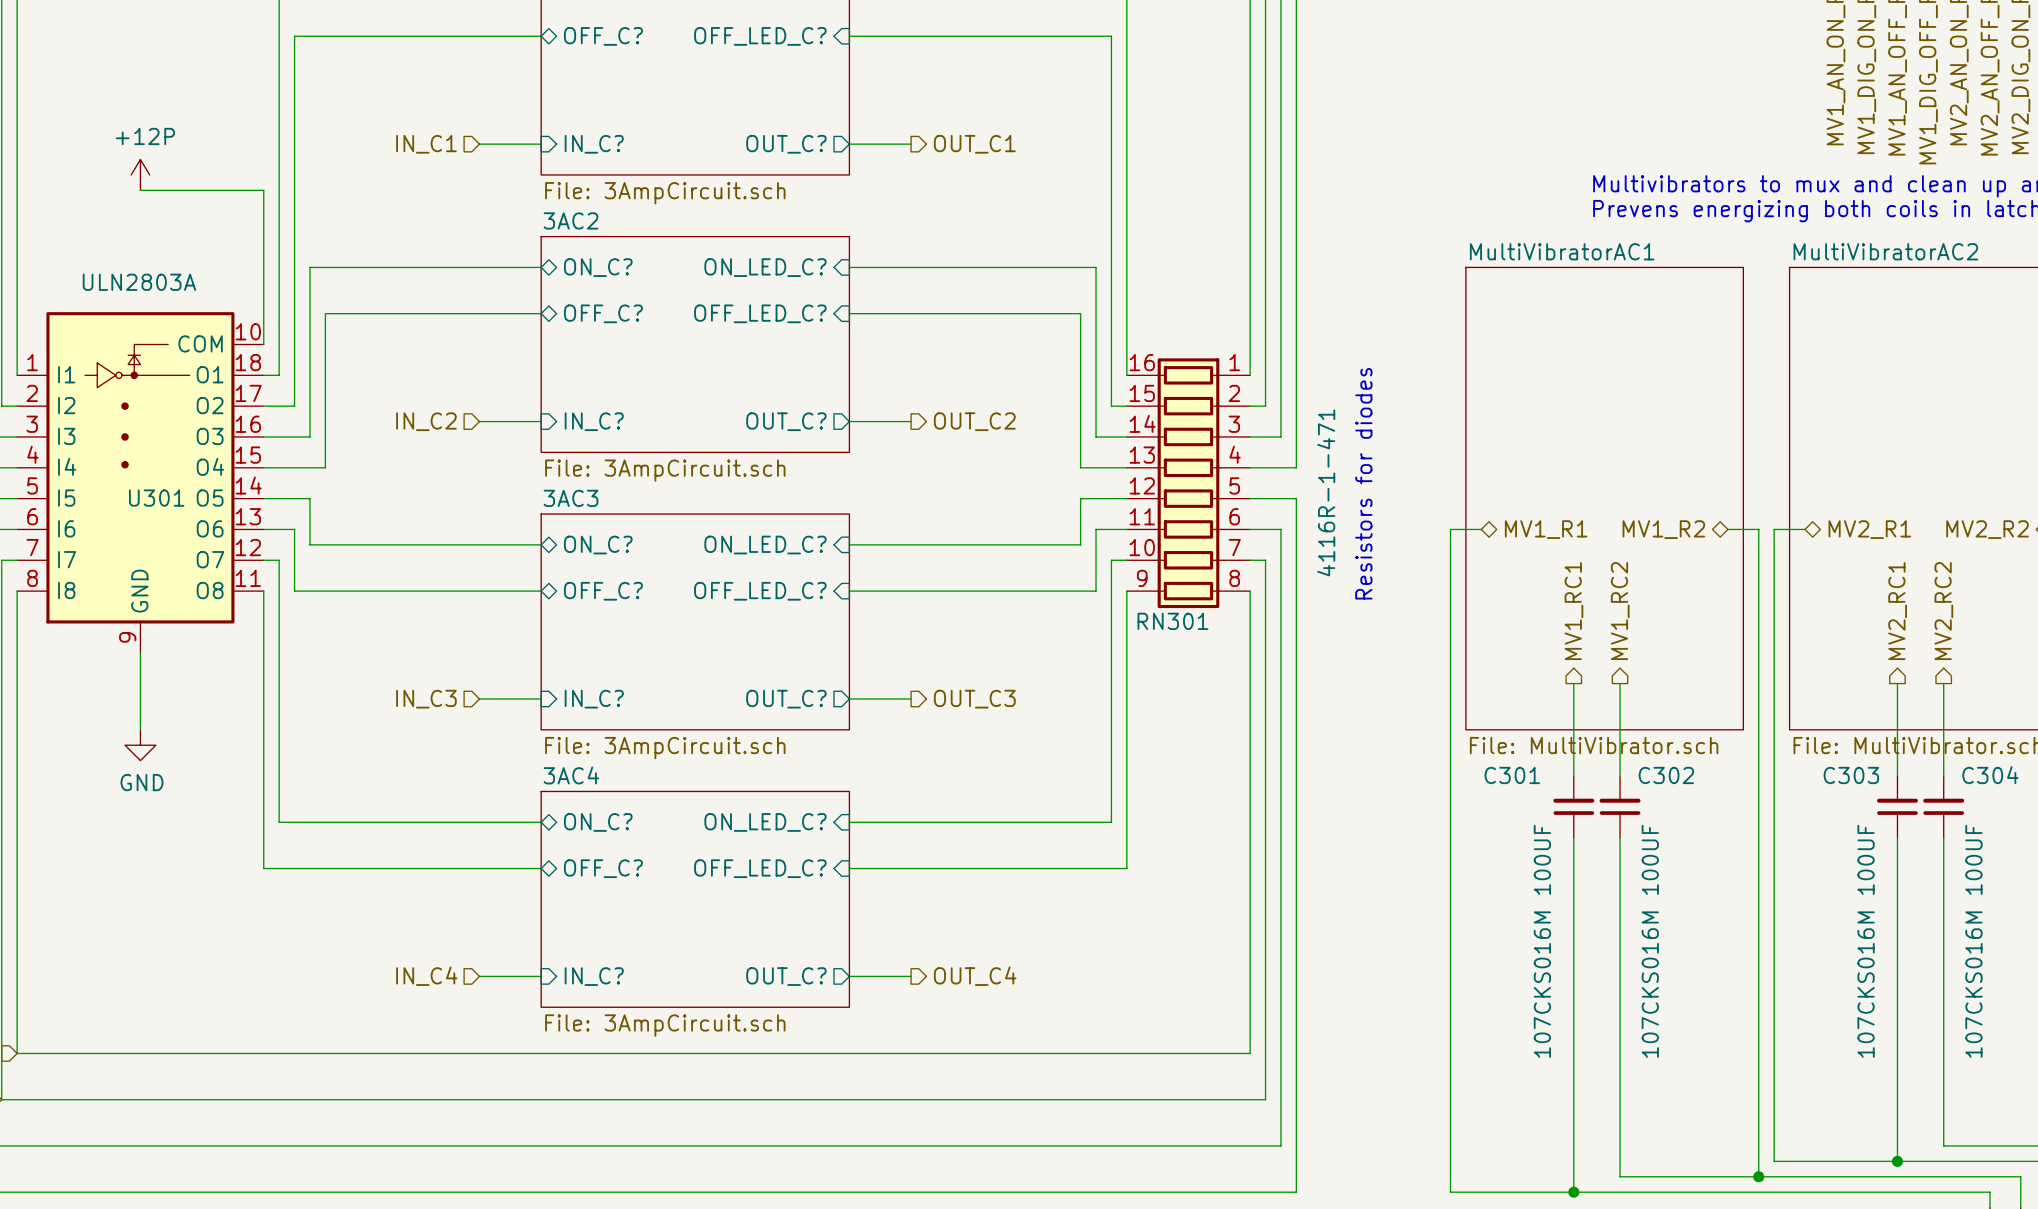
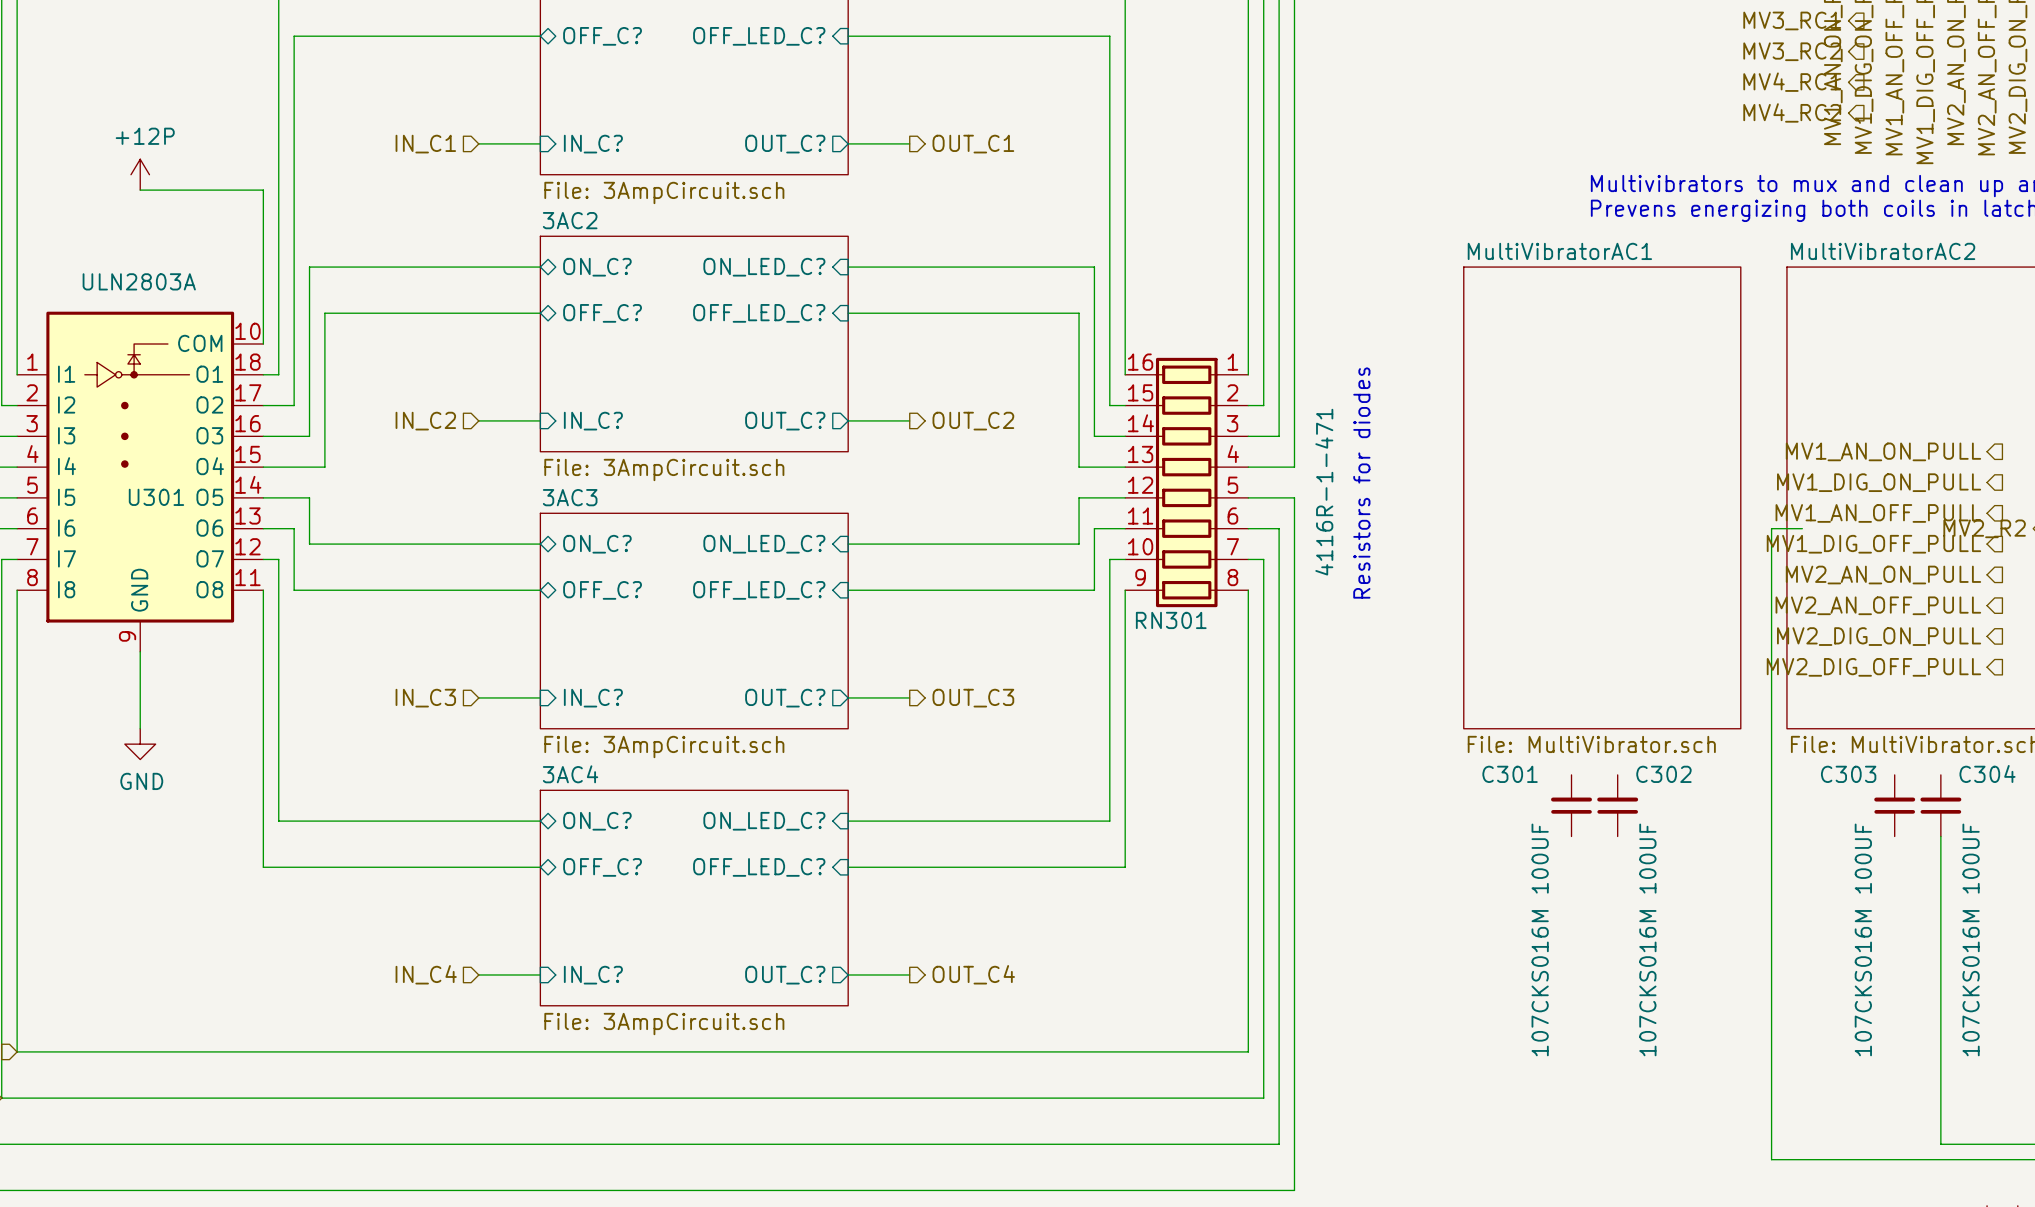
hierarchical label: none -> MV3_RC1 (1792, 20)
hierarchical label: none -> MV3_RC2 (1792, 51)
hierarchical label: none -> MV4_RC1 (1792, 82)
hierarchical label: none -> MV4_RC2 (1792, 112)
hierarchical label: none -> MV1_AN_ON_PULL (1883, 451)
hierarchical label: none -> MV1_DIG_ON_PULL (1879, 482)
hierarchical label: none -> MV1_AN_OFF_PULL (1878, 513)
wire: (1481, 529) (1450, 529) (1450, 1192) (1989, 1192) (1989, 1207) -> none
hierarchical label: MV1_R1 (1546, 529) -> none
hierarchical label: MV1_R2 (1663, 529) -> none
wire: (1727, 529) (1758, 529) (1758, 1176) -> none
hierarchical label: MV2_R1 (1869, 529) -> none
hierarchical label: none -> MV1_DIG_OFF_PULL (1873, 544)
hierarchical label: none -> MV2_AN_ON_PULL (1883, 575)
hierarchical label: none -> MV2_AN_OFF_PULL (1878, 605)
hierarchical label: MV1_RC1 (1573, 611) -> none
hierarchical label: MV1_RC2 (1620, 611) -> none
hierarchical label: MV2_RC1 (1897, 611) -> none
hierarchical label: MV2_RC2 (1943, 611) -> none
hierarchical label: none -> MV2_DIG_ON_PULL (1879, 636)
hierarchical label: none -> MV2_DIG_OFF_PULL (1873, 667)
wire: (1573, 683) (1573, 776) -> none
wire: (1620, 683) (1620, 776) -> none
wire: (1897, 683) (1897, 776) -> none
wire: (1943, 683) (1943, 776) -> none
wire: (1573, 837) (1573, 1192) -> none
wire: (1620, 837) (1620, 1176) (2020, 1176) (2020, 1207) -> none
wire: (1897, 837) (1897, 1161) -> none
junction: (1897, 1161) -> none
junction: (1758, 1176) -> none
junction: (1573, 1192) -> none

